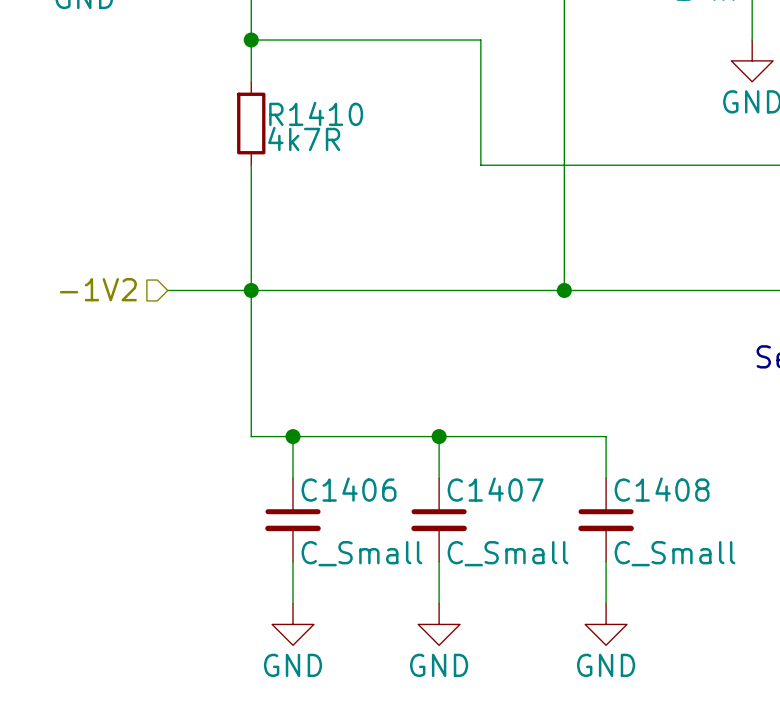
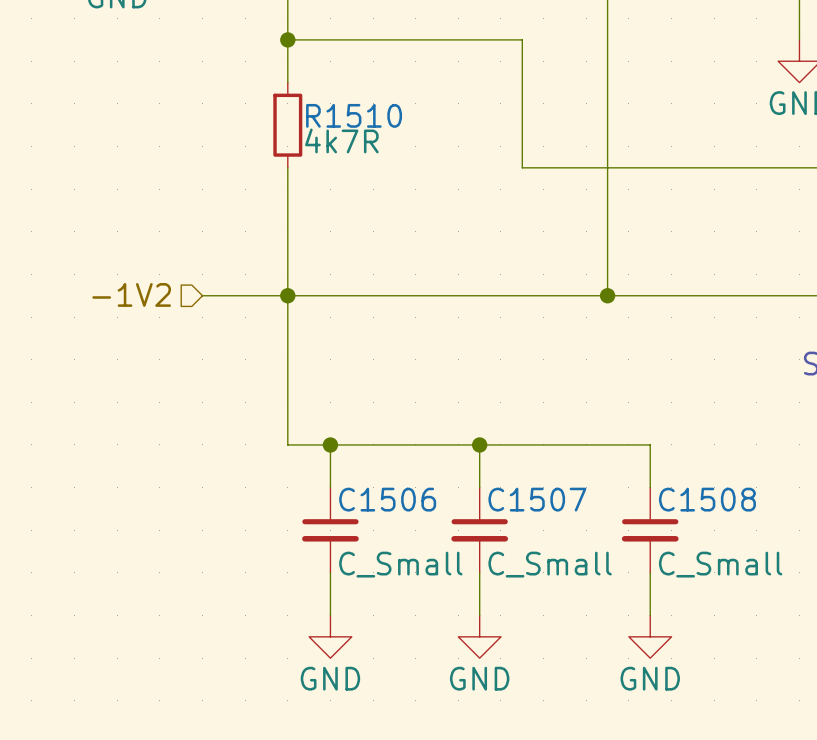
R1410 name: R1410 (316, 113) -> R1510 (354, 115)
C1406 name: C1406 (349, 489) -> C1506 (387, 499)
C1407 name: C1407 (495, 489) -> C1507 (537, 499)
C1408 name: C1408 (662, 489) -> C1508 (707, 499)

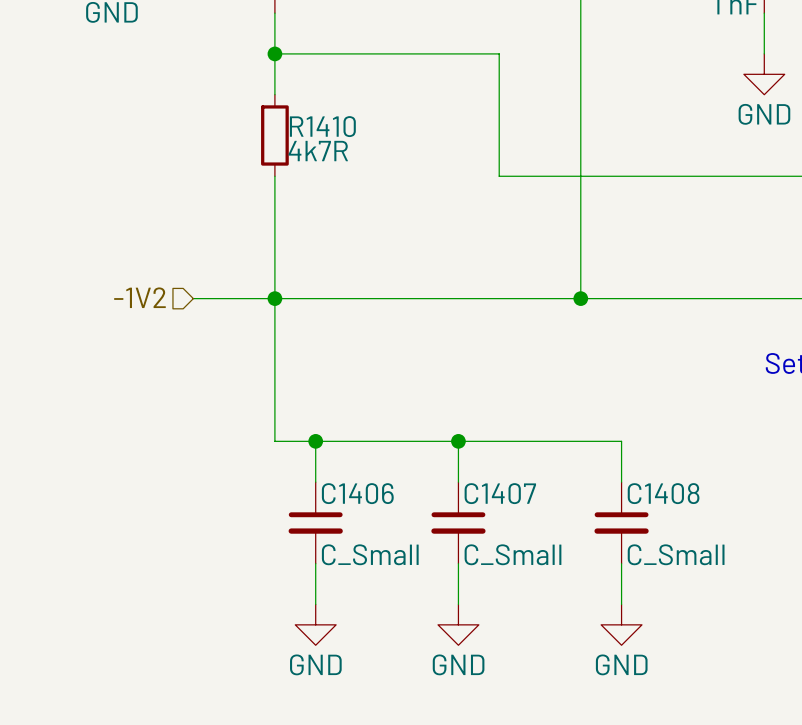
R1510 name: R1510 (354, 115) -> R1410 (322, 126)
C1506 name: C1506 (387, 499) -> C1406 (357, 493)
C1507 name: C1507 (537, 499) -> C1407 (500, 493)
C1508 name: C1508 (707, 499) -> C1408 (663, 493)

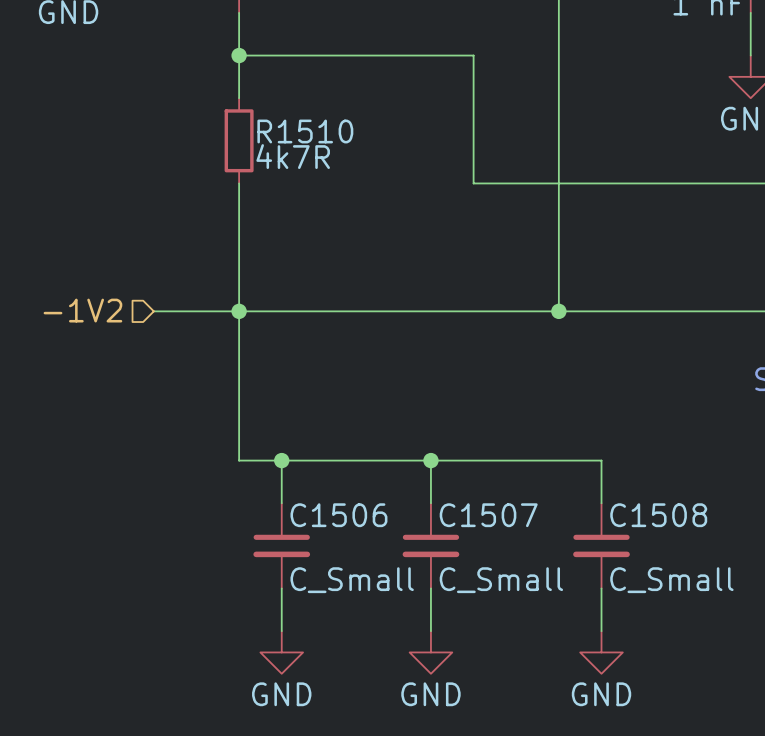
R1410 name: R1410 (322, 126) -> R1510 (305, 131)
C1406 name: C1406 (357, 493) -> C1506 (338, 515)
C1407 name: C1407 (500, 493) -> C1507 (488, 515)
C1408 name: C1408 (663, 493) -> C1508 (658, 515)

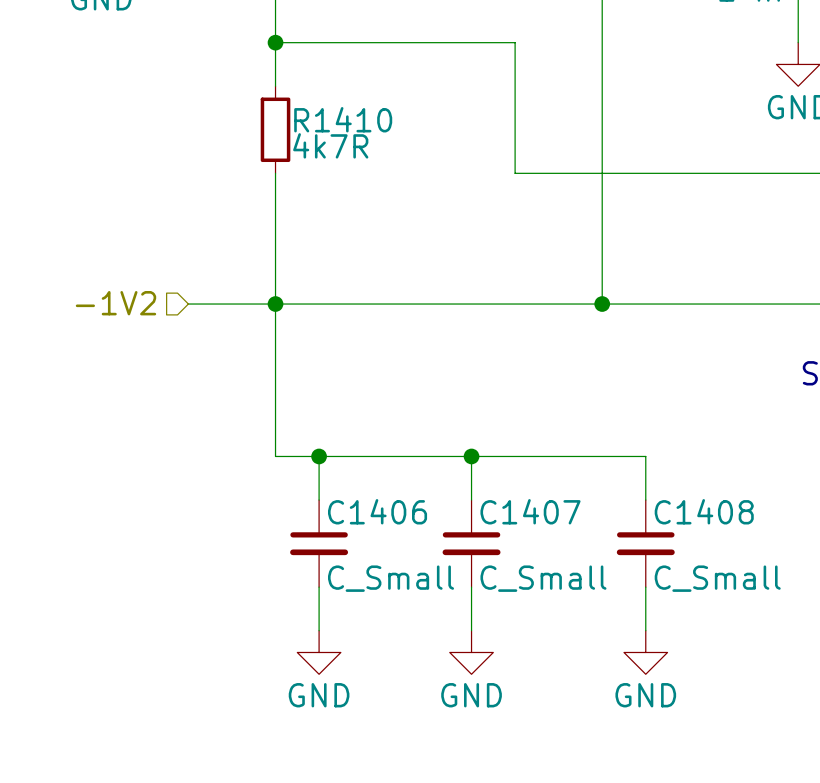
R1510 name: R1510 (305, 131) -> R1410 (343, 119)
C1506 name: C1506 (338, 515) -> C1406 (377, 511)
C1507 name: C1507 (488, 515) -> C1407 (530, 511)
C1508 name: C1508 (658, 515) -> C1408 (704, 511)

